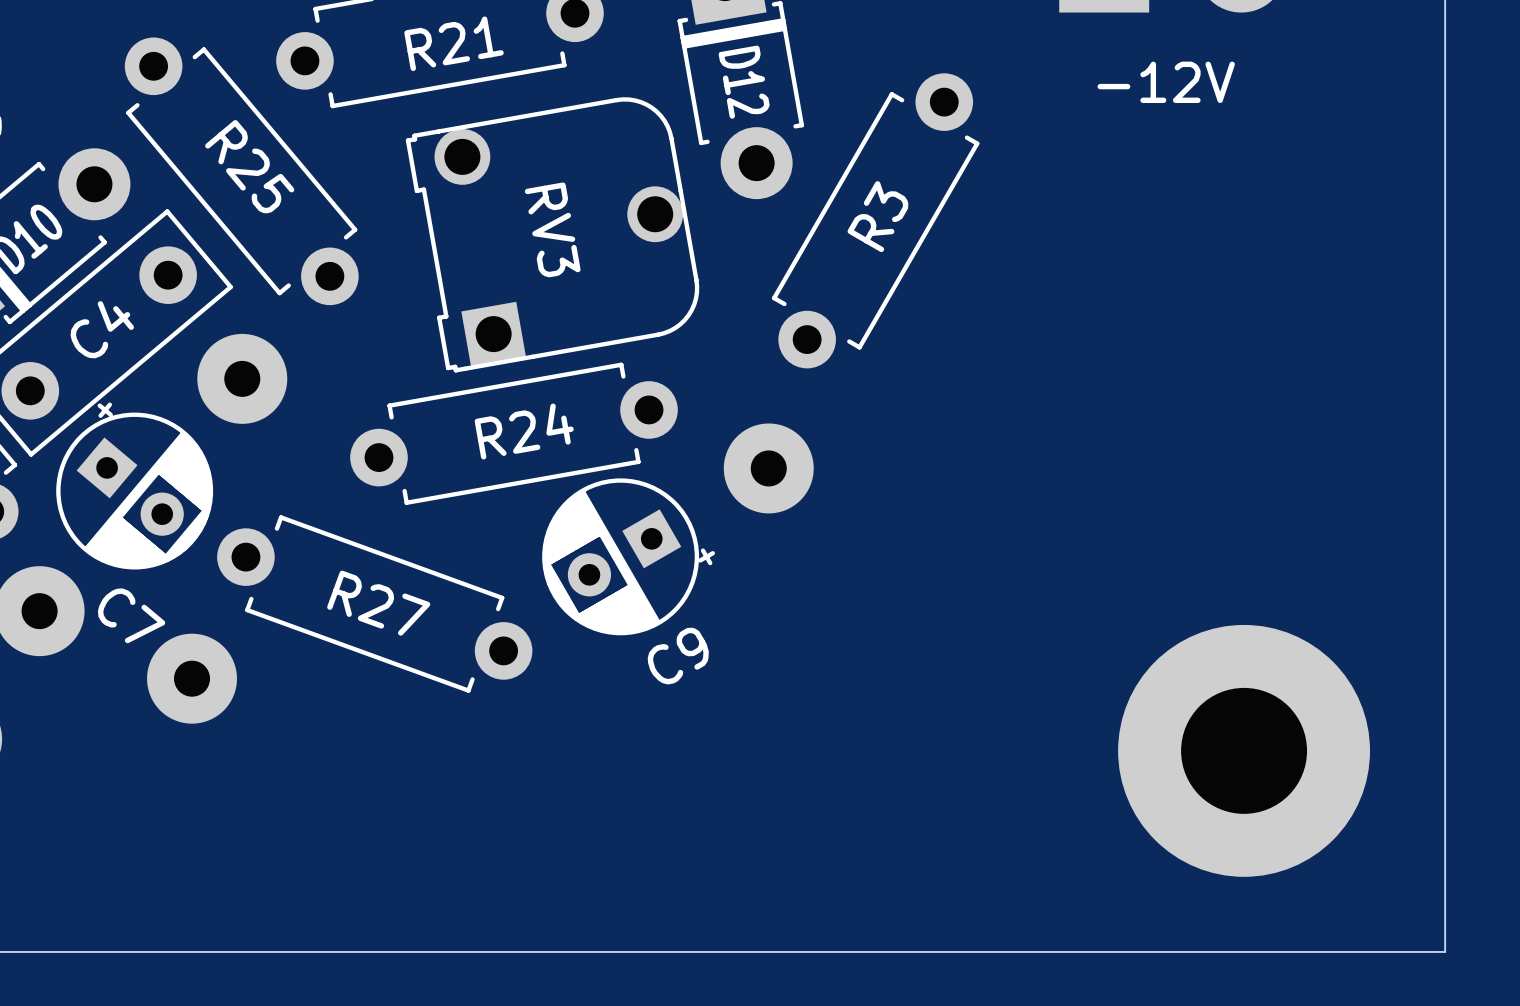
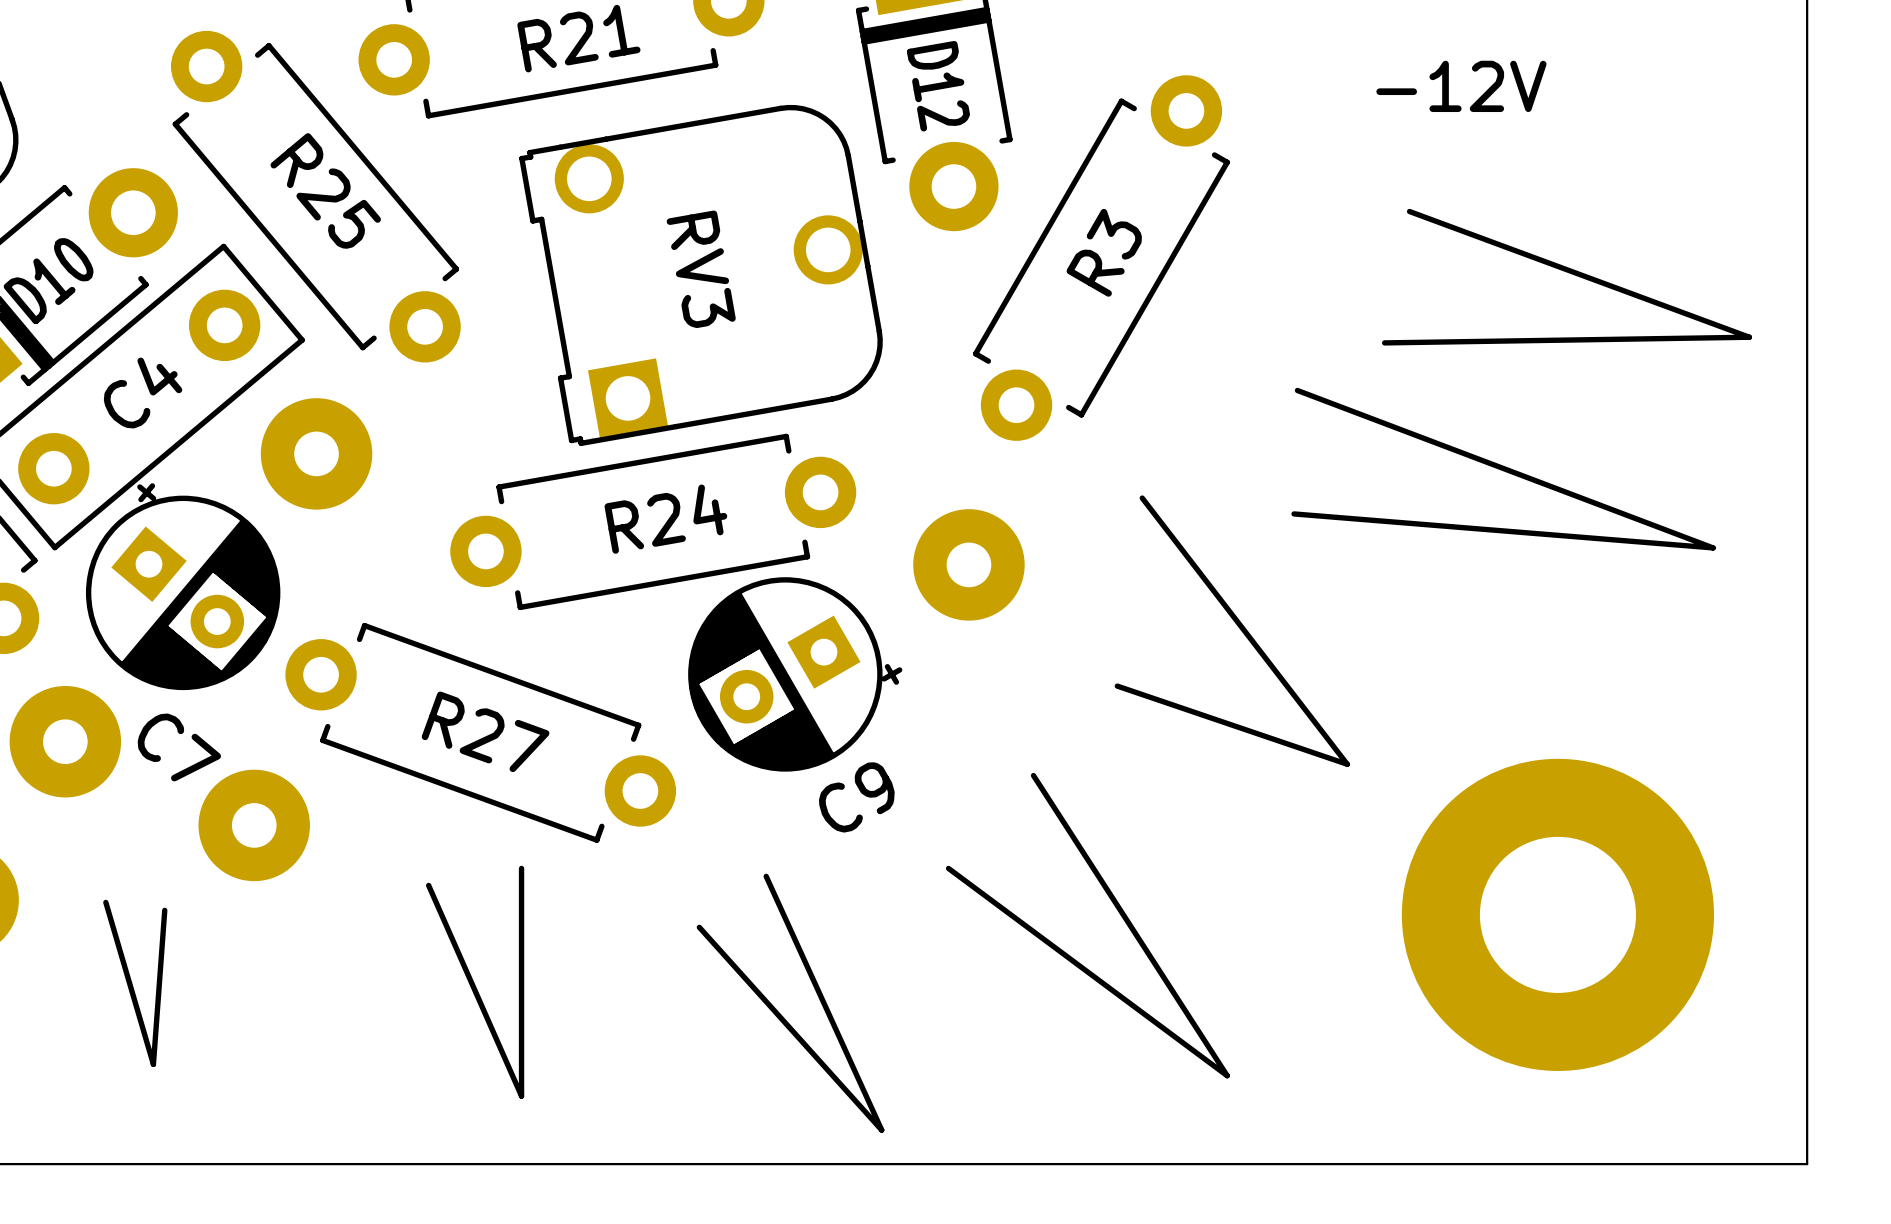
line: none -> (1409, 211) (1749, 337) (1384, 342)
line: none -> (1297, 390) (1713, 547) (1294, 513)
line: none -> (1142, 498) (1347, 764) (1117, 686)
line: none -> (1033, 775) (1227, 1075) (948, 868)
line: none -> (521, 868) (521, 1096) (428, 885)
line: none -> (766, 876) (881, 1130) (699, 927)
line: none -> (105, 902) (153, 1064) (164, 910)

